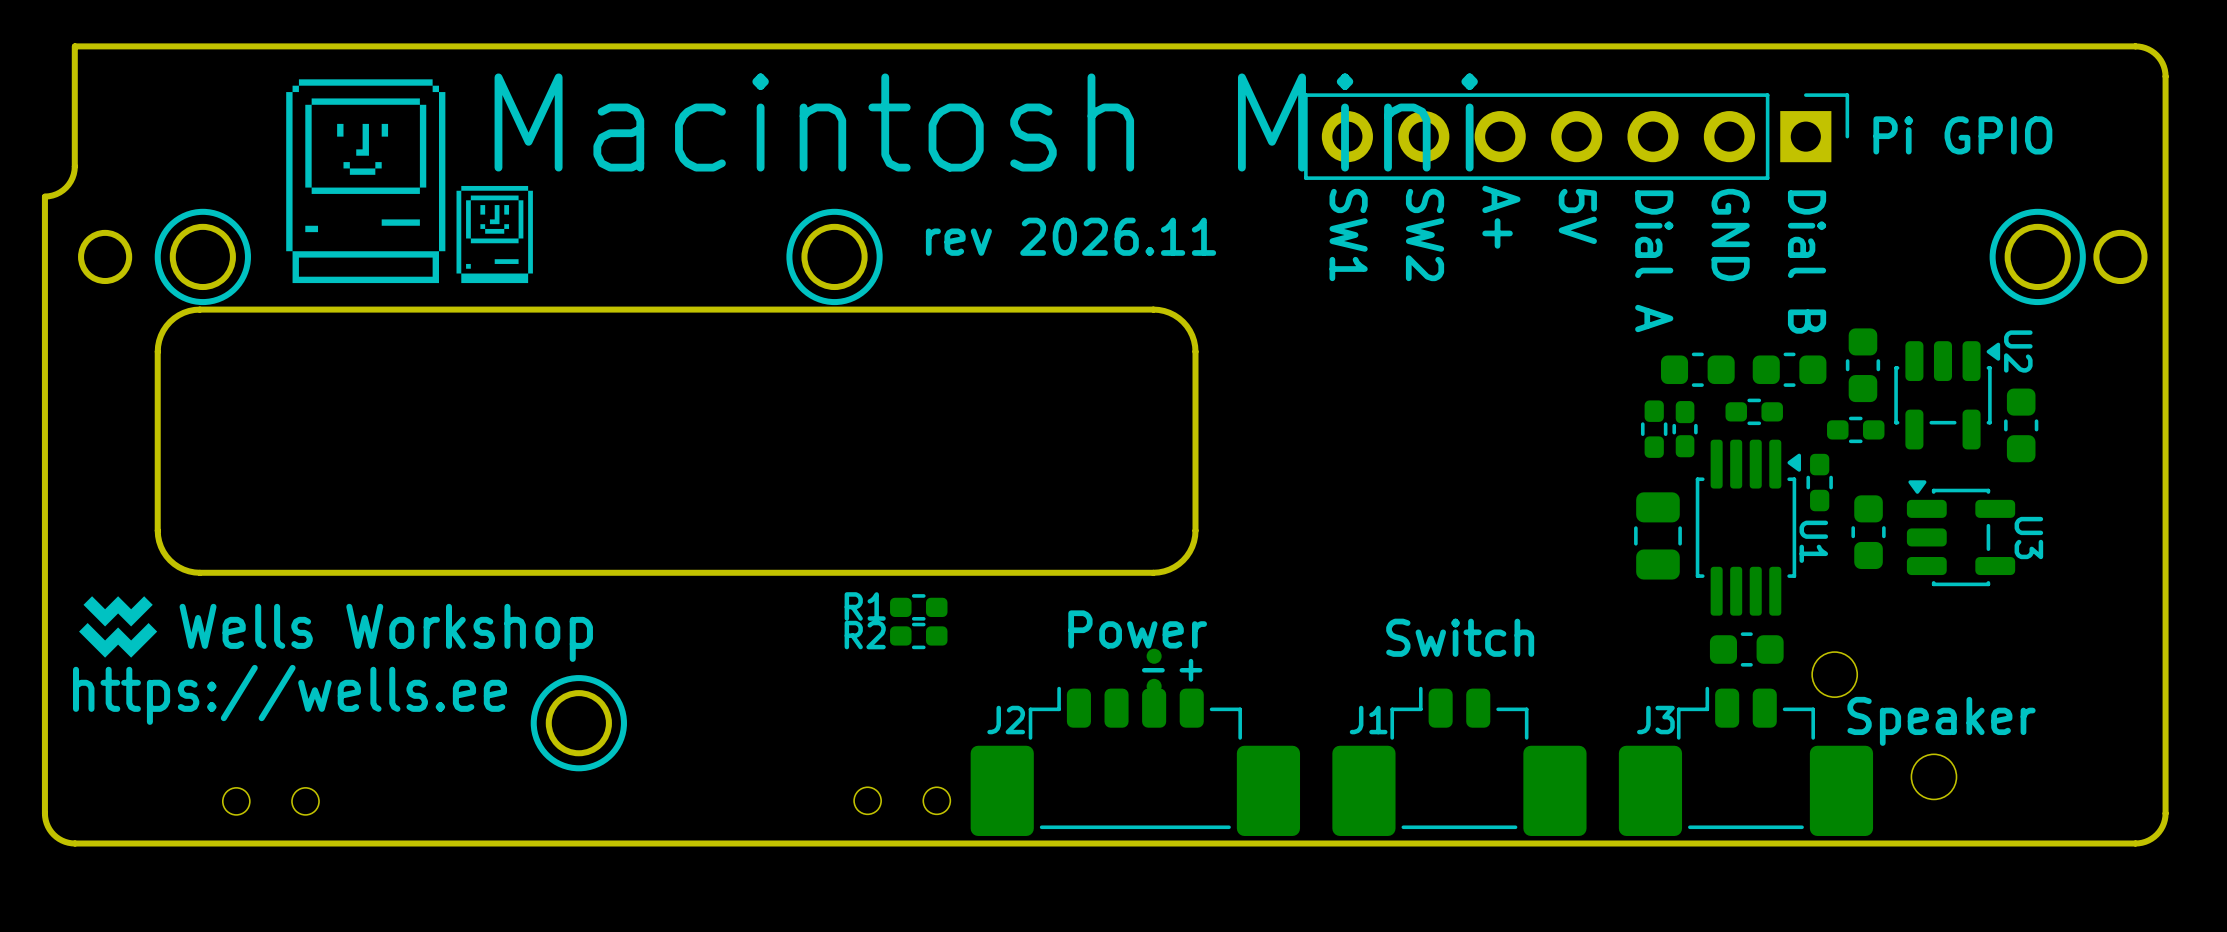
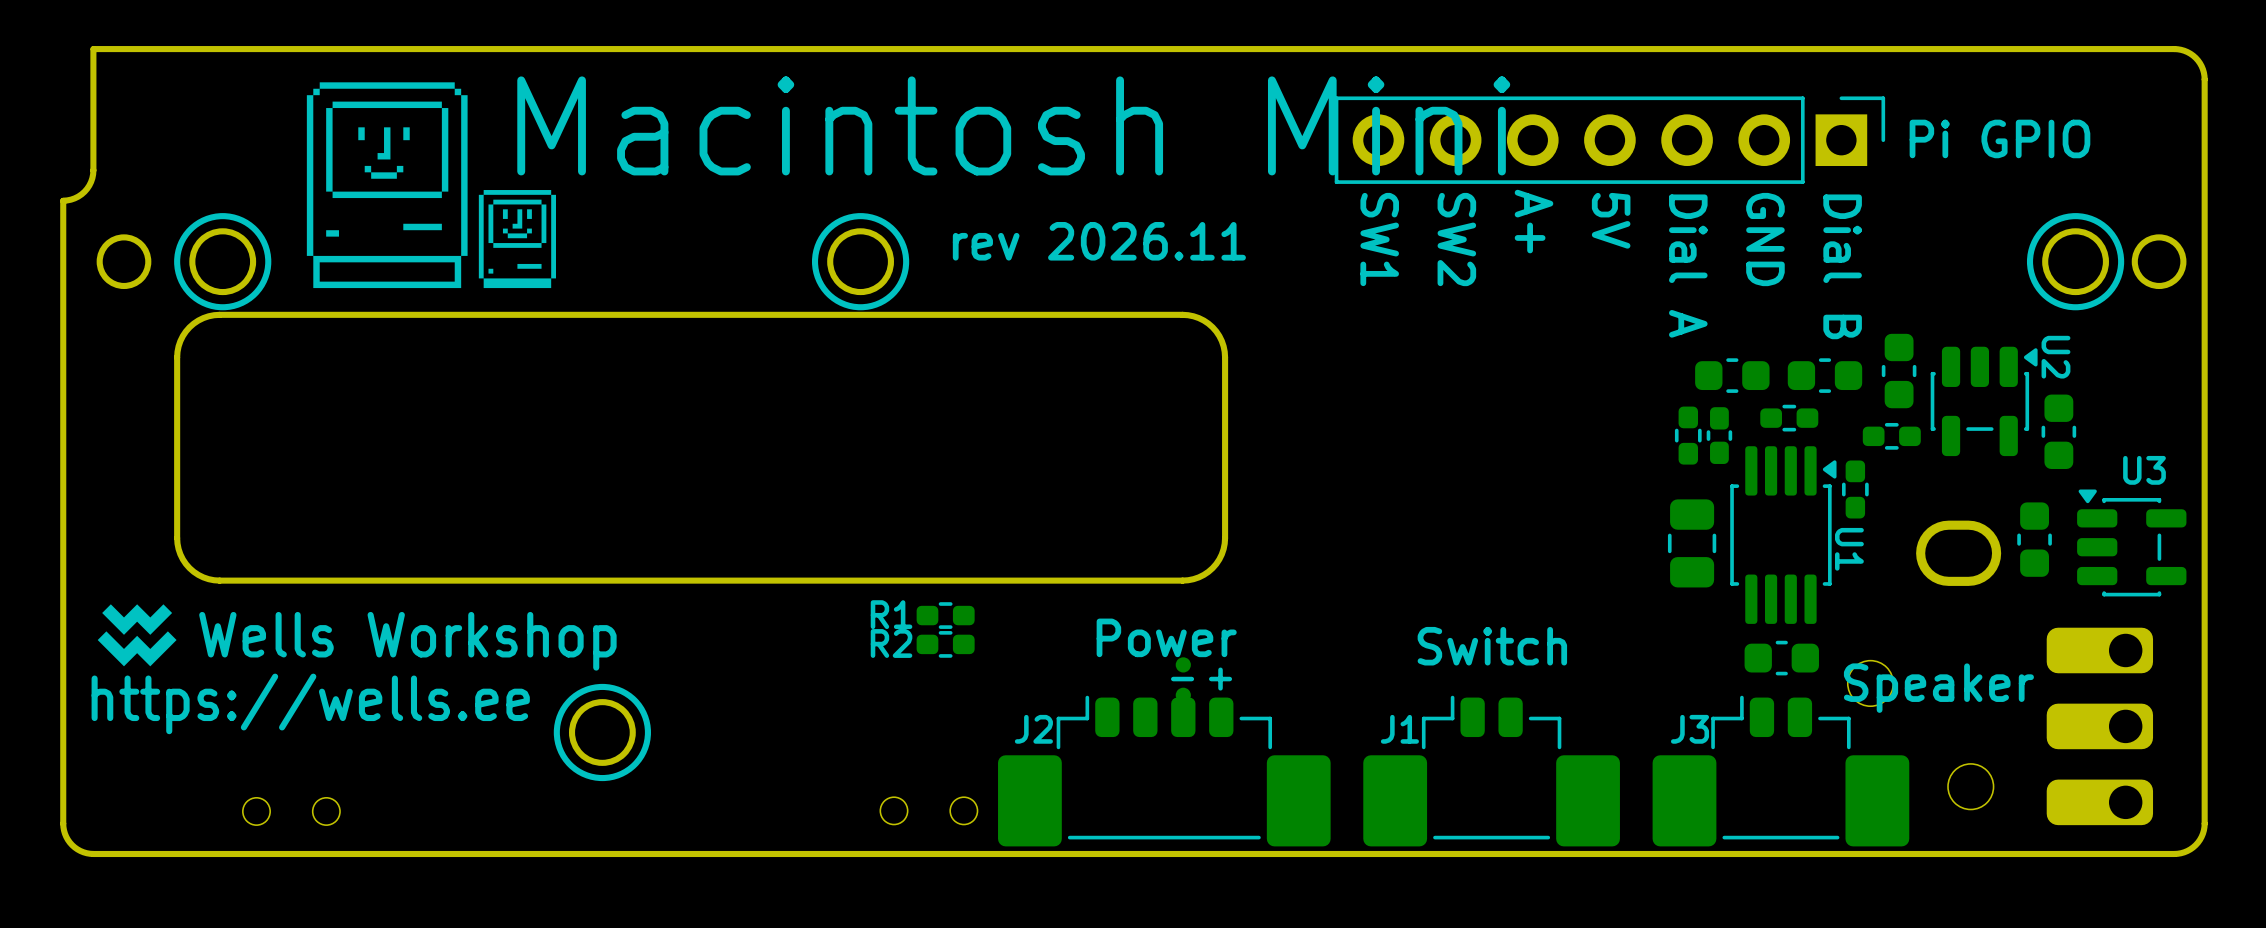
part position: (1868, 532) -> (2034, 539)
U3 position: (1961, 533) -> (2131, 542)
U3 name rotation: 0° (2028, 538) -> 90° counterclockwise (2144, 470)
U3 name position: U3 (2028, 538) -> U3 (2144, 470)
part: none -> (2034, 672)
J3 text position: Speaker (1941, 721) -> Speaker (1938, 688)

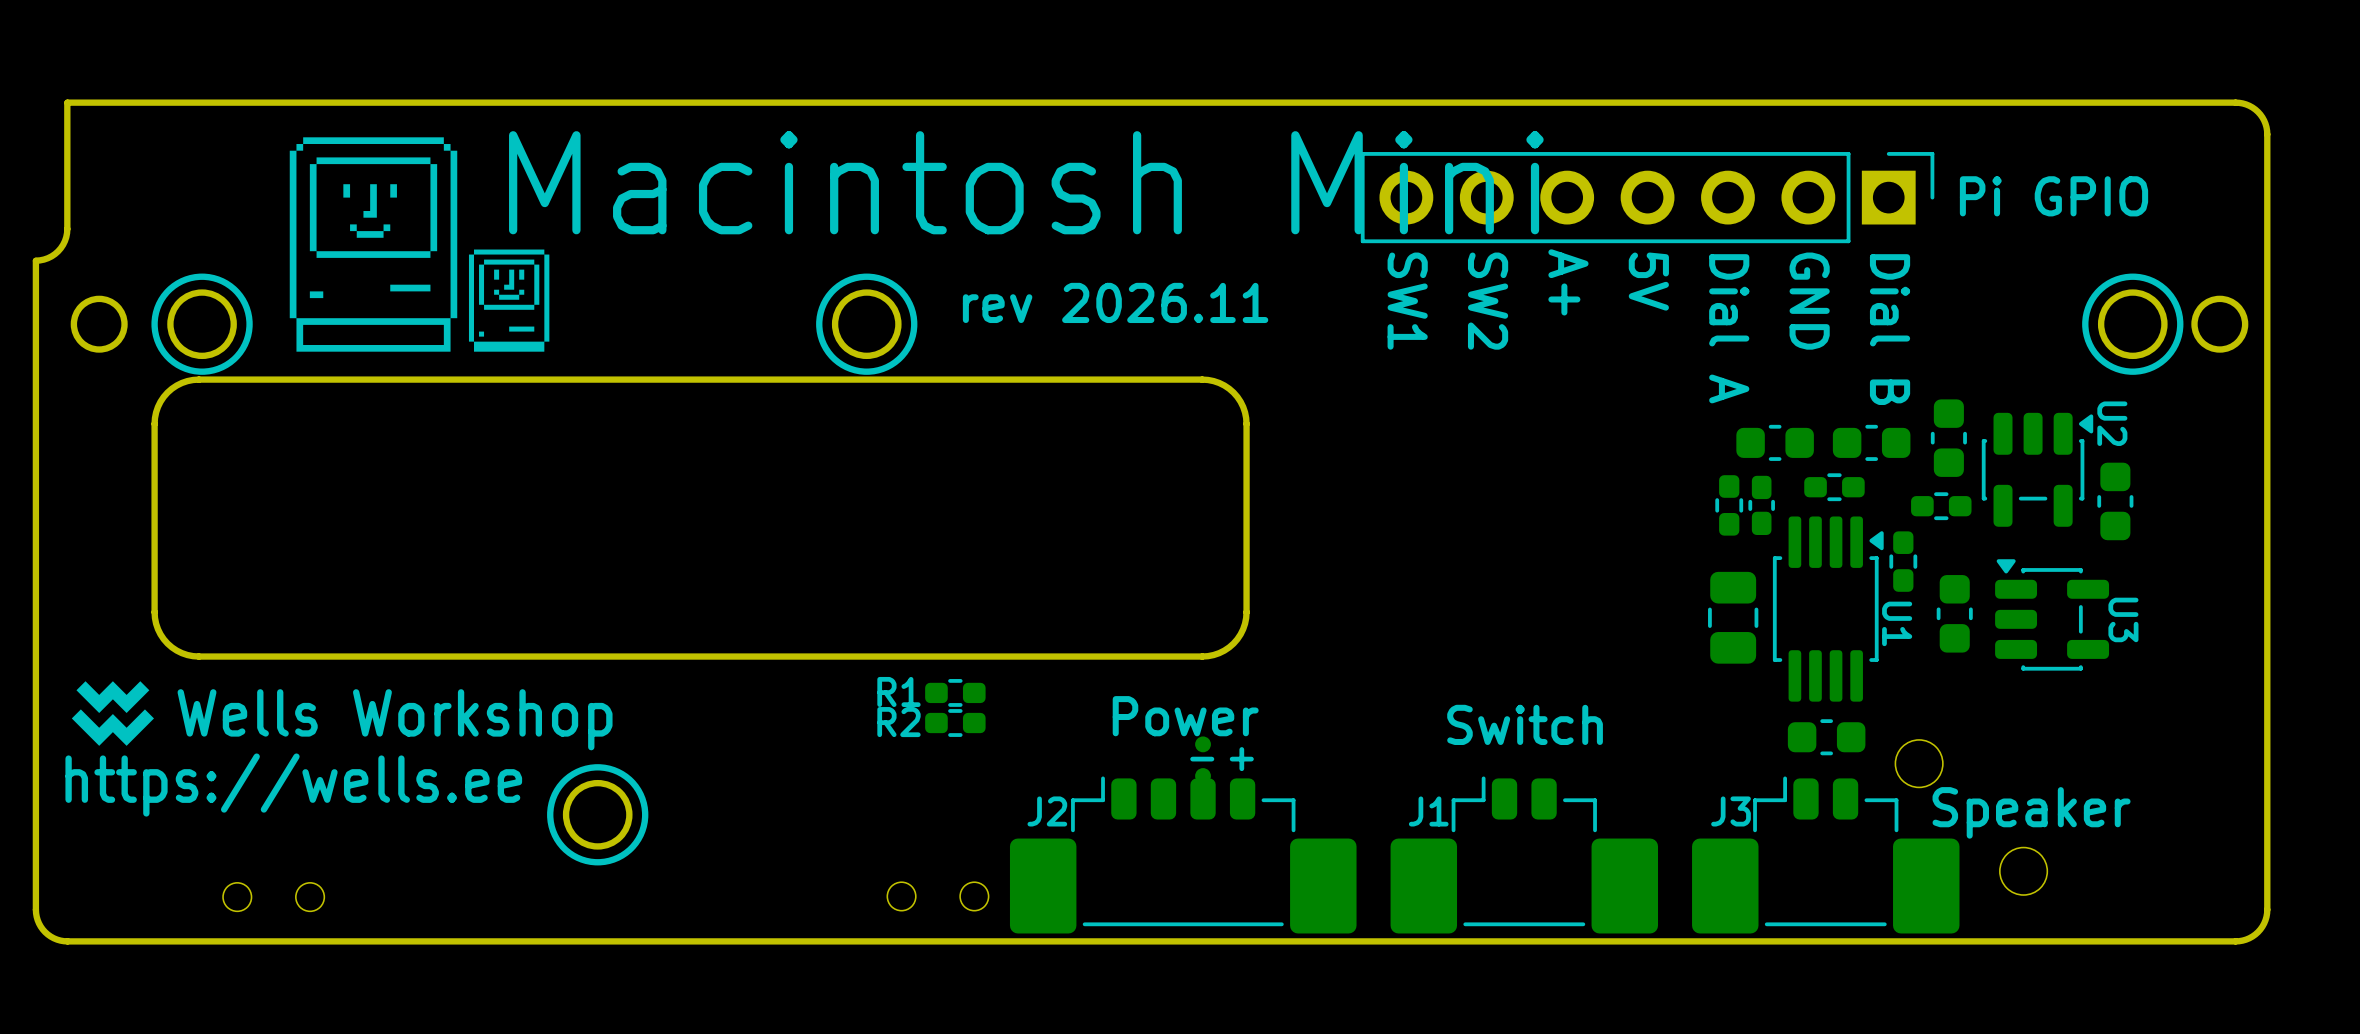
U3 name rotation: 0° (2144, 470) -> 90° clockwise (2123, 619)
U3 name position: U3 (2144, 470) -> U3 (2123, 619)
part position: (2034, 539) -> (1954, 613)
U3 position: (2131, 542) -> (2052, 614)
part: (2034, 672) -> none
J3 text position: Speaker (1938, 688) -> Speaker (2031, 812)

